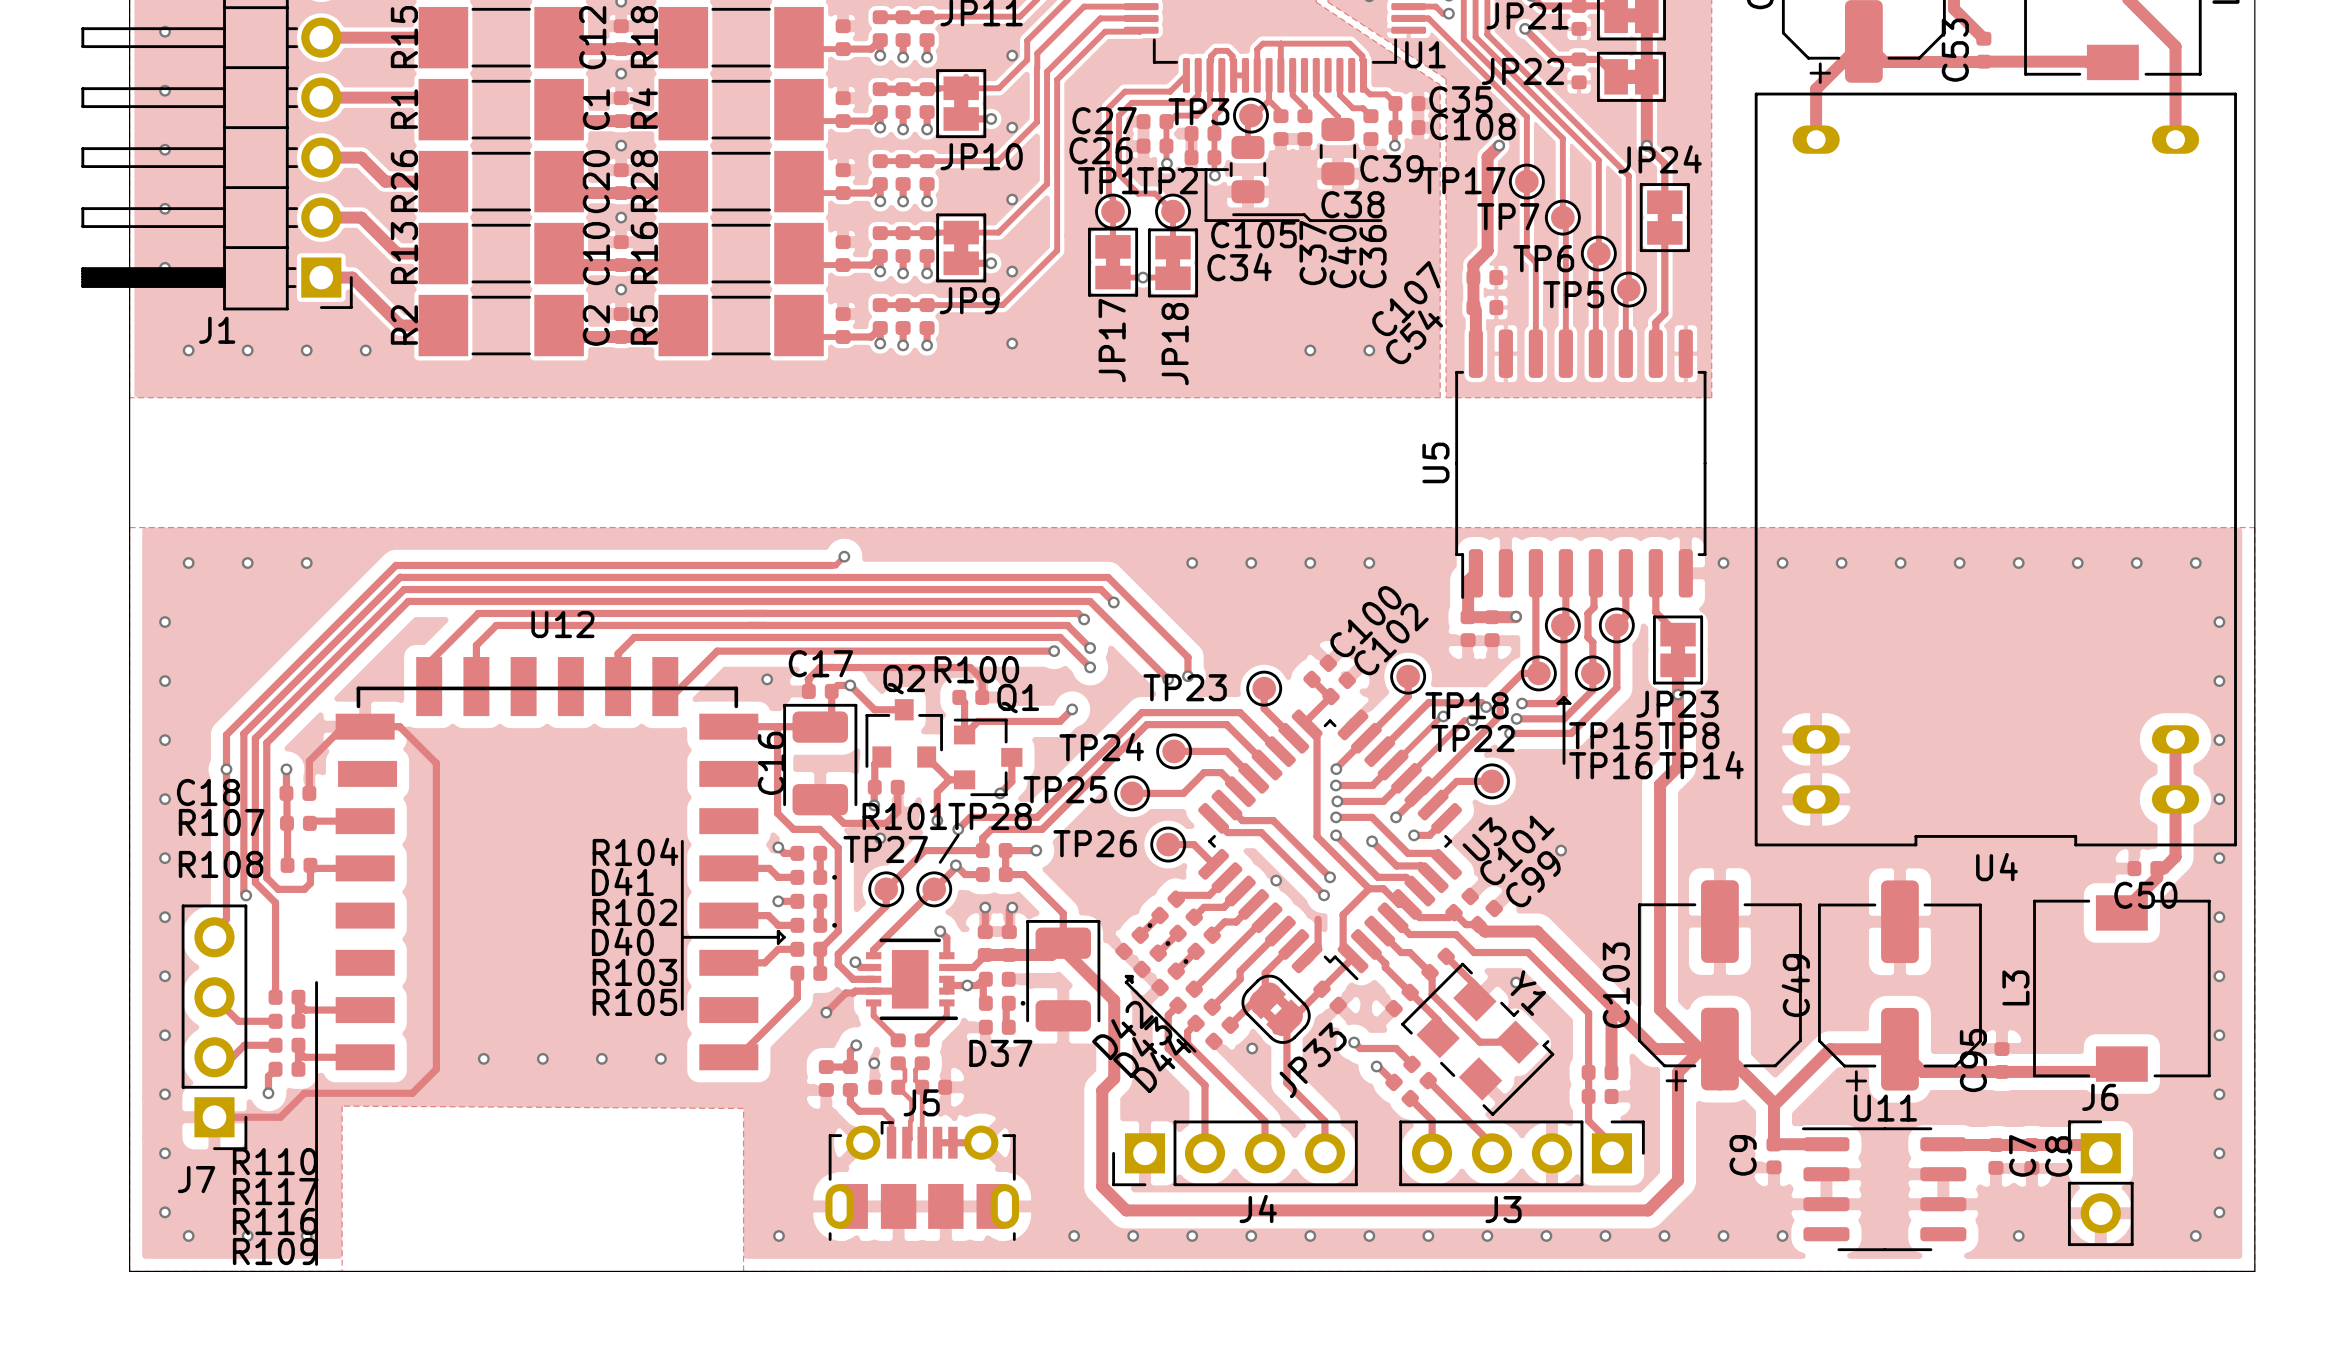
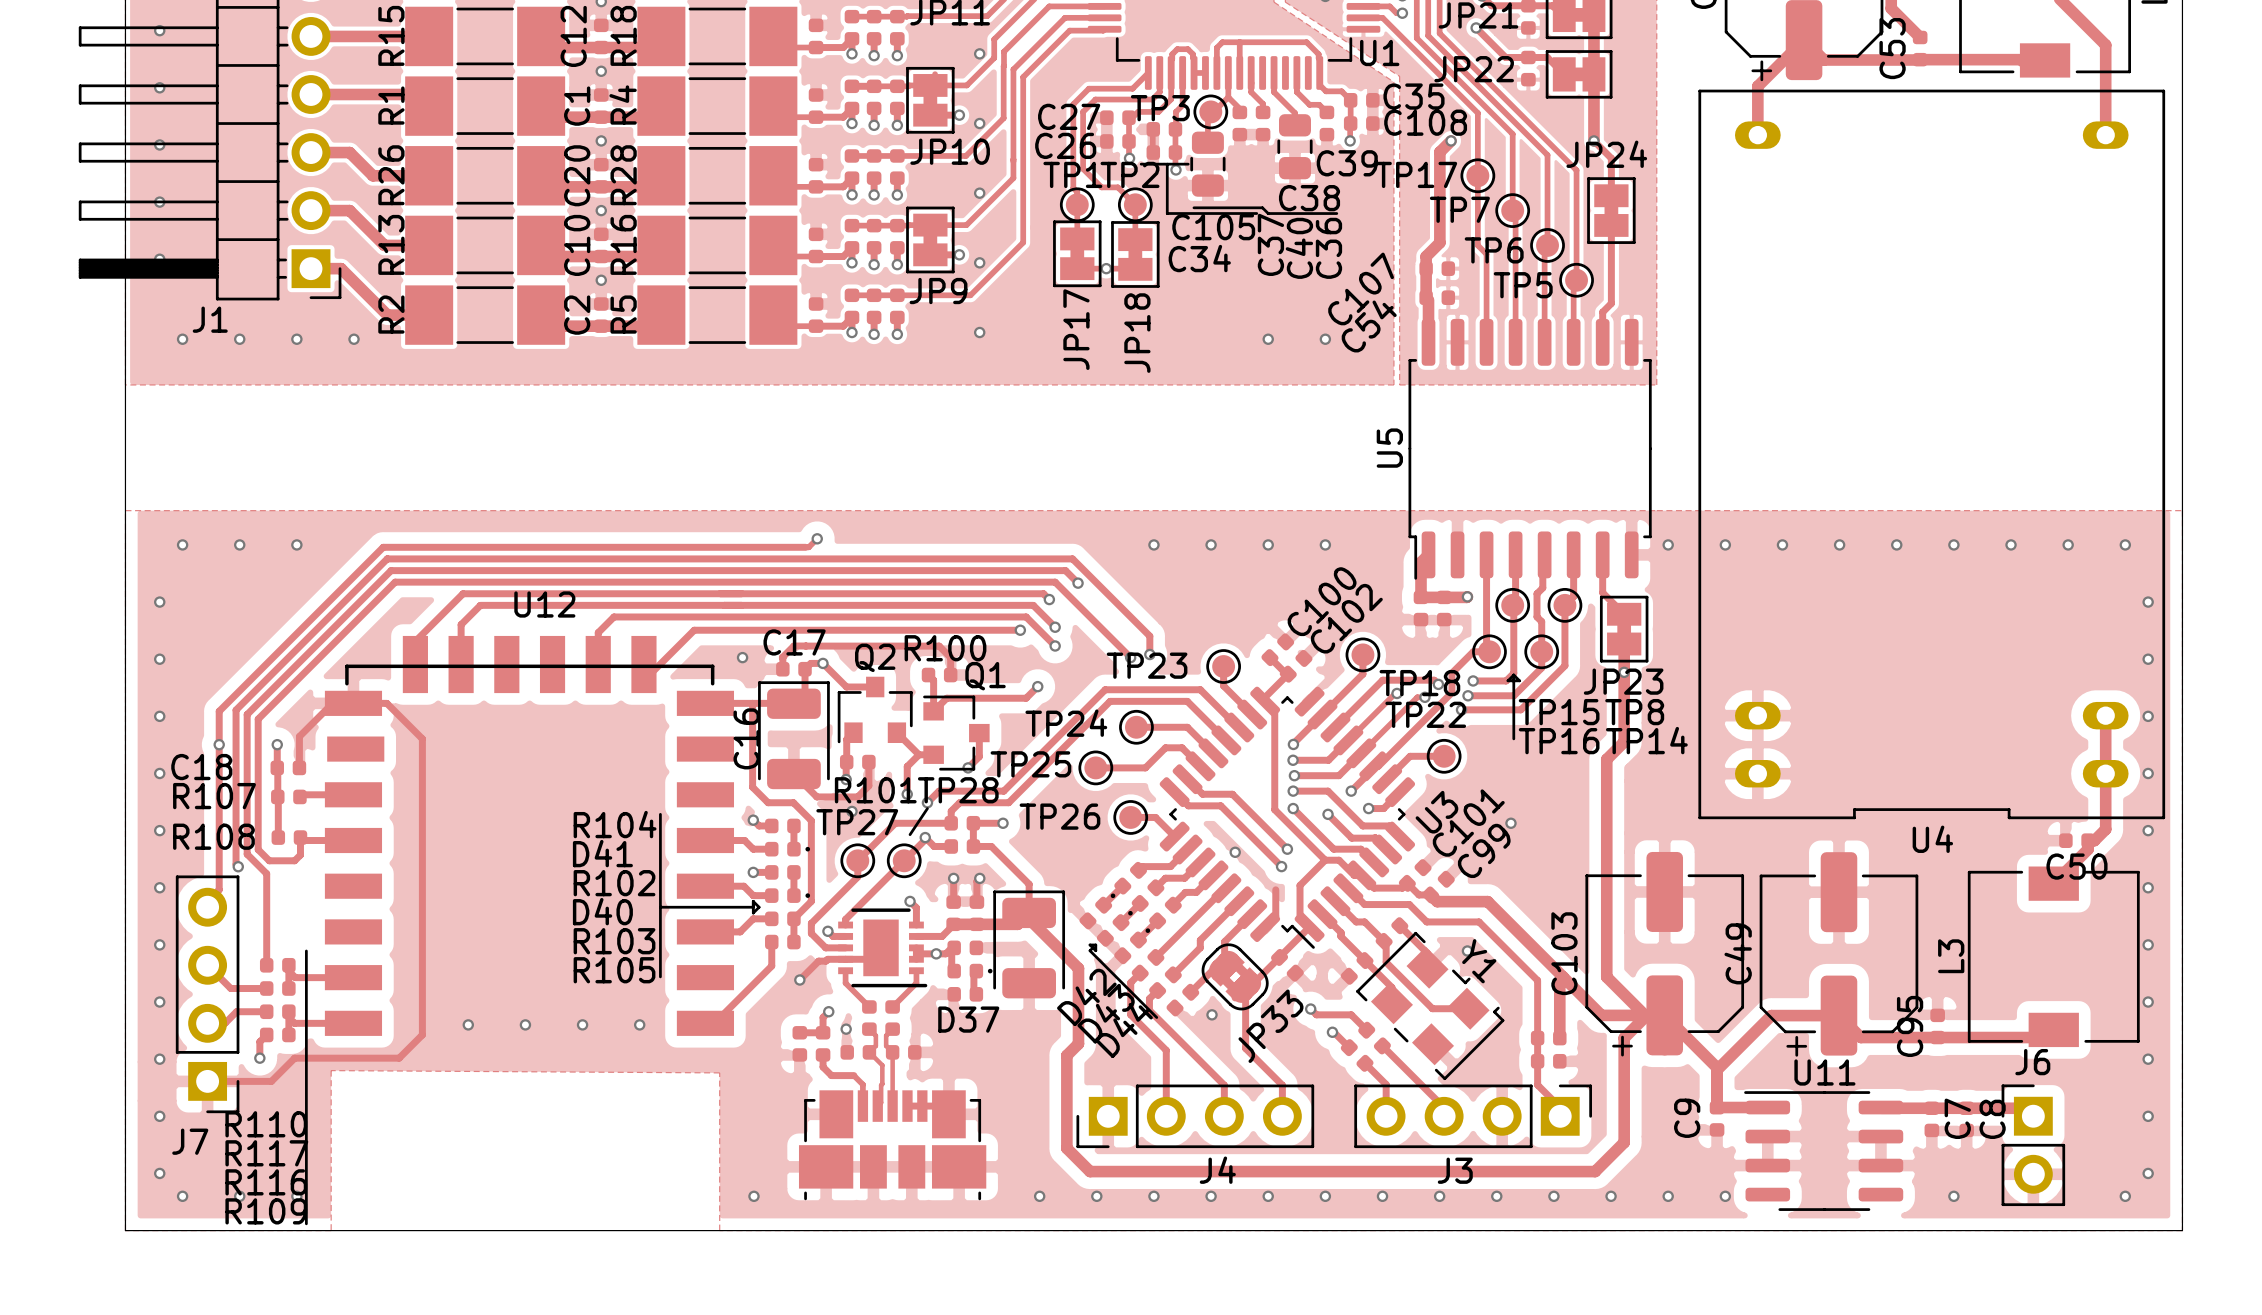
J5: (922, 1181) -> none
part: none -> (892, 1145)

